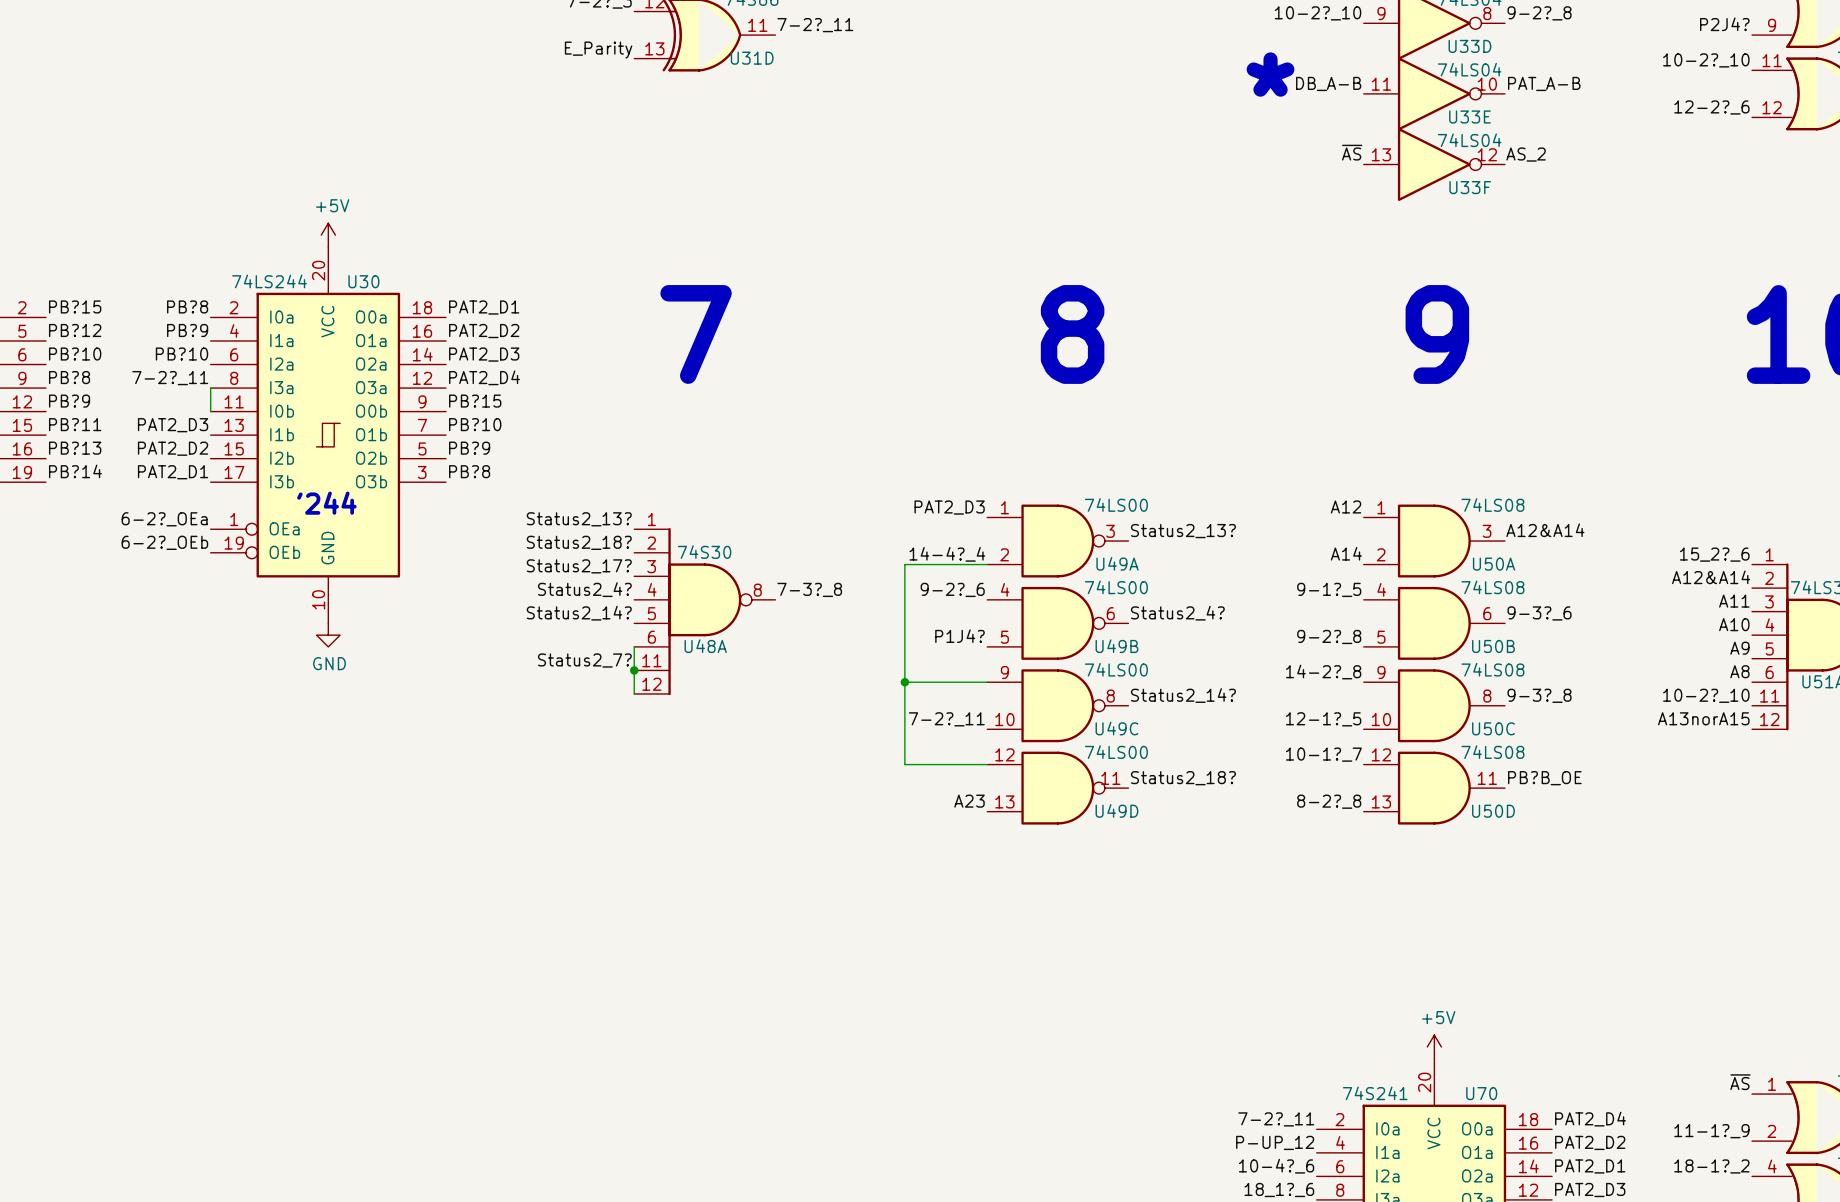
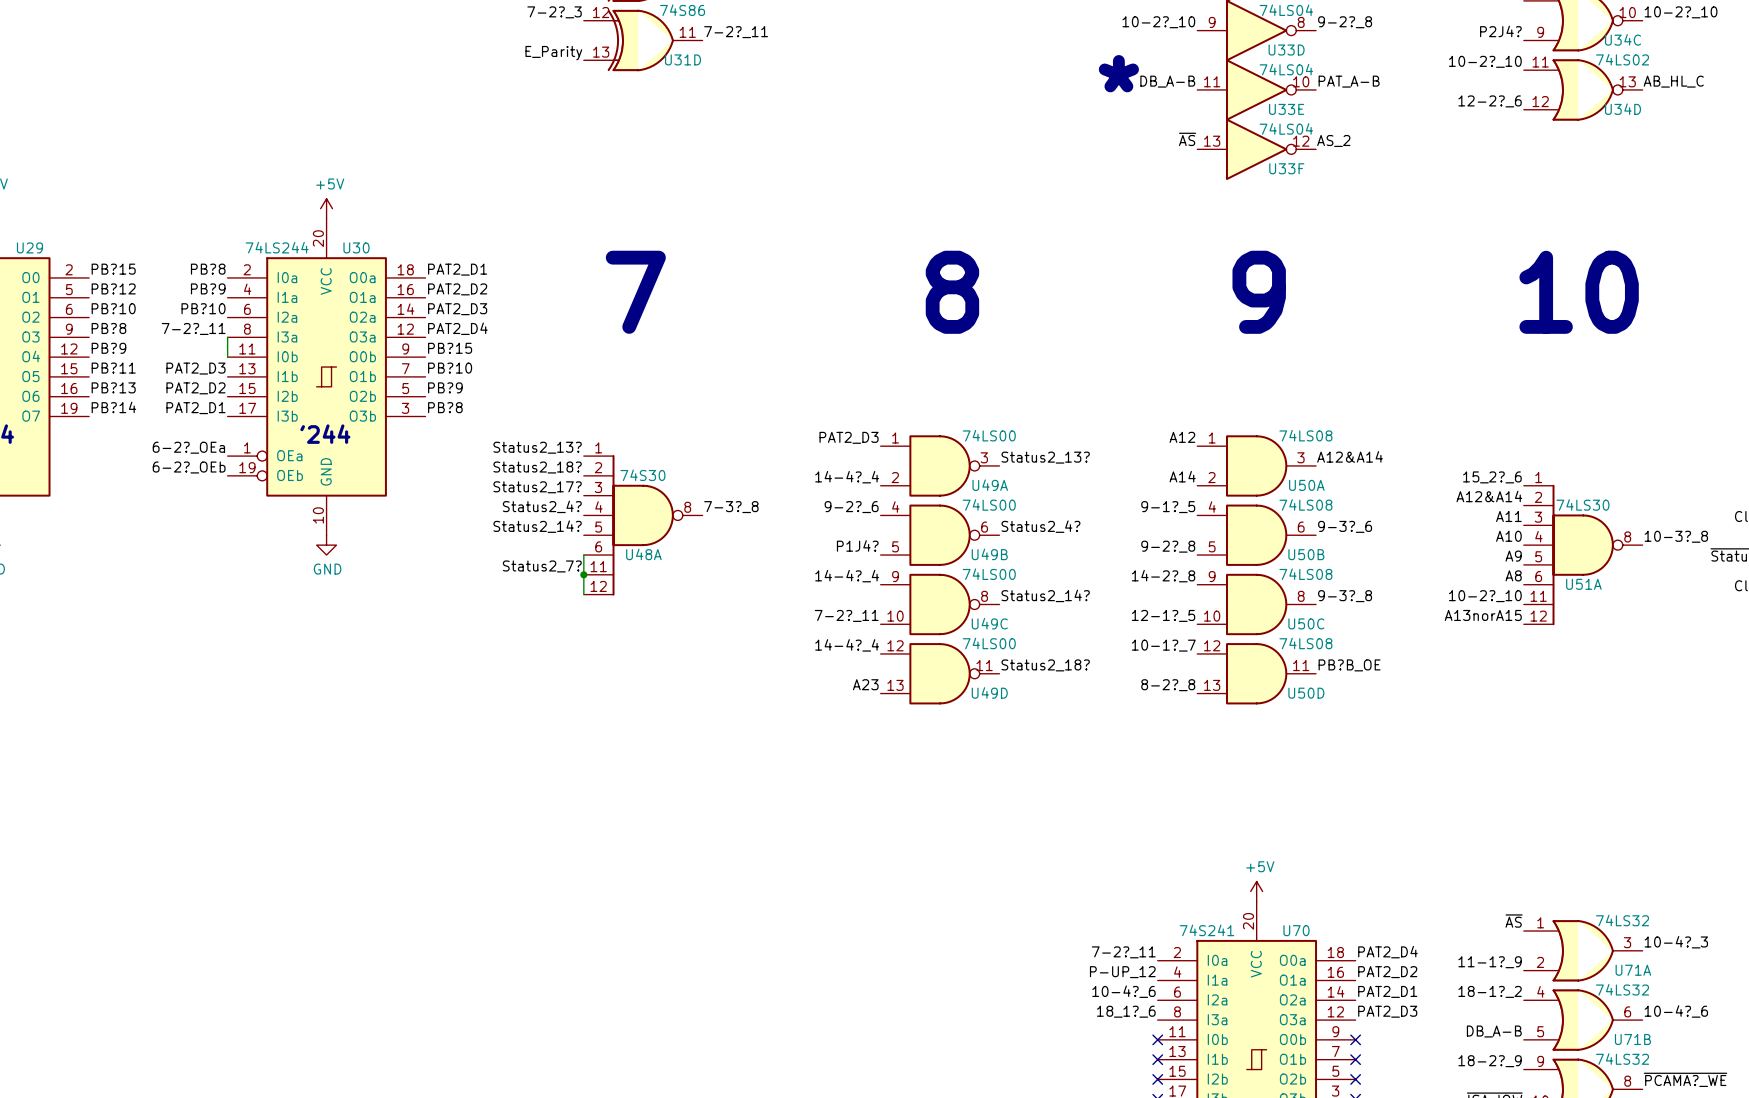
wire: (987, 564) (904, 564) (904, 764) (987, 764) -> none
label: none -> 14-4?_4 (847, 576)
wire: (904, 682) (987, 682) -> none
junction: (904, 682) -> none
label: none -> 14-4?_4 (847, 645)

